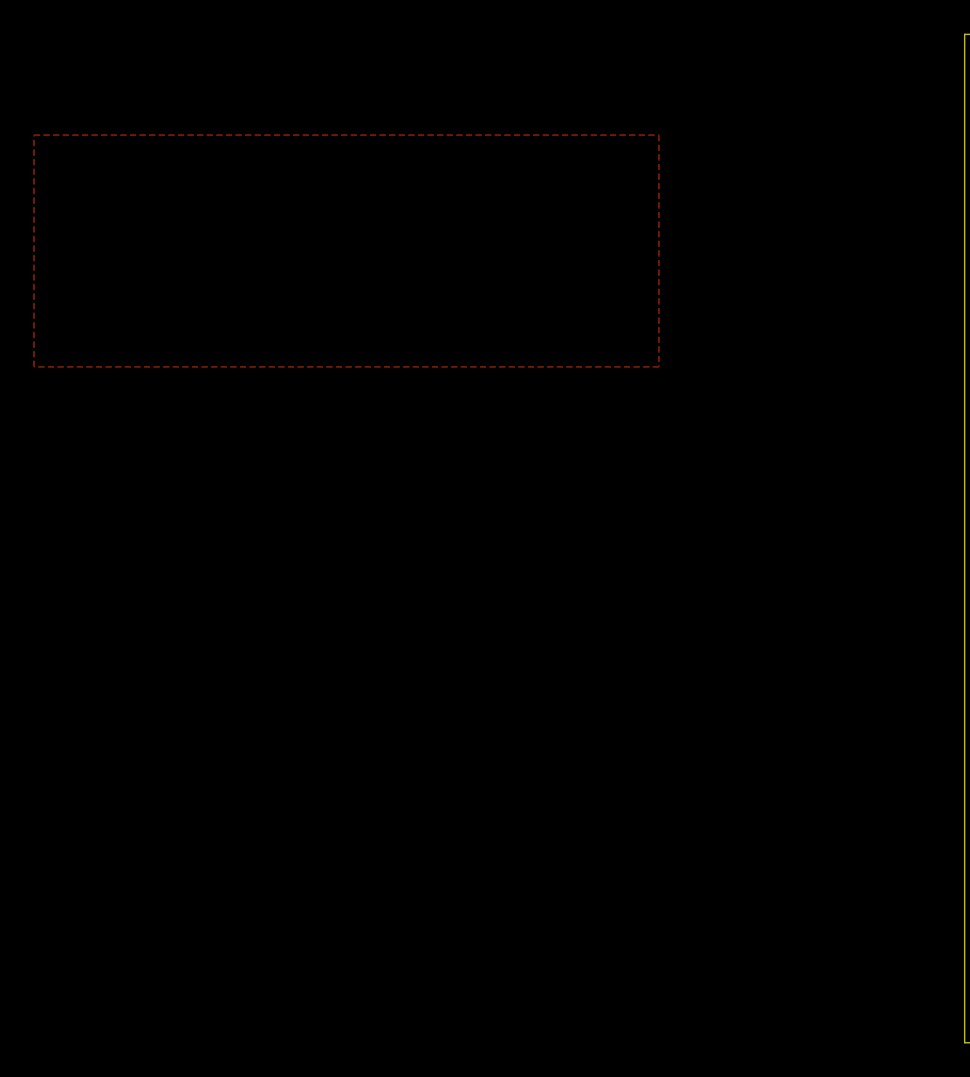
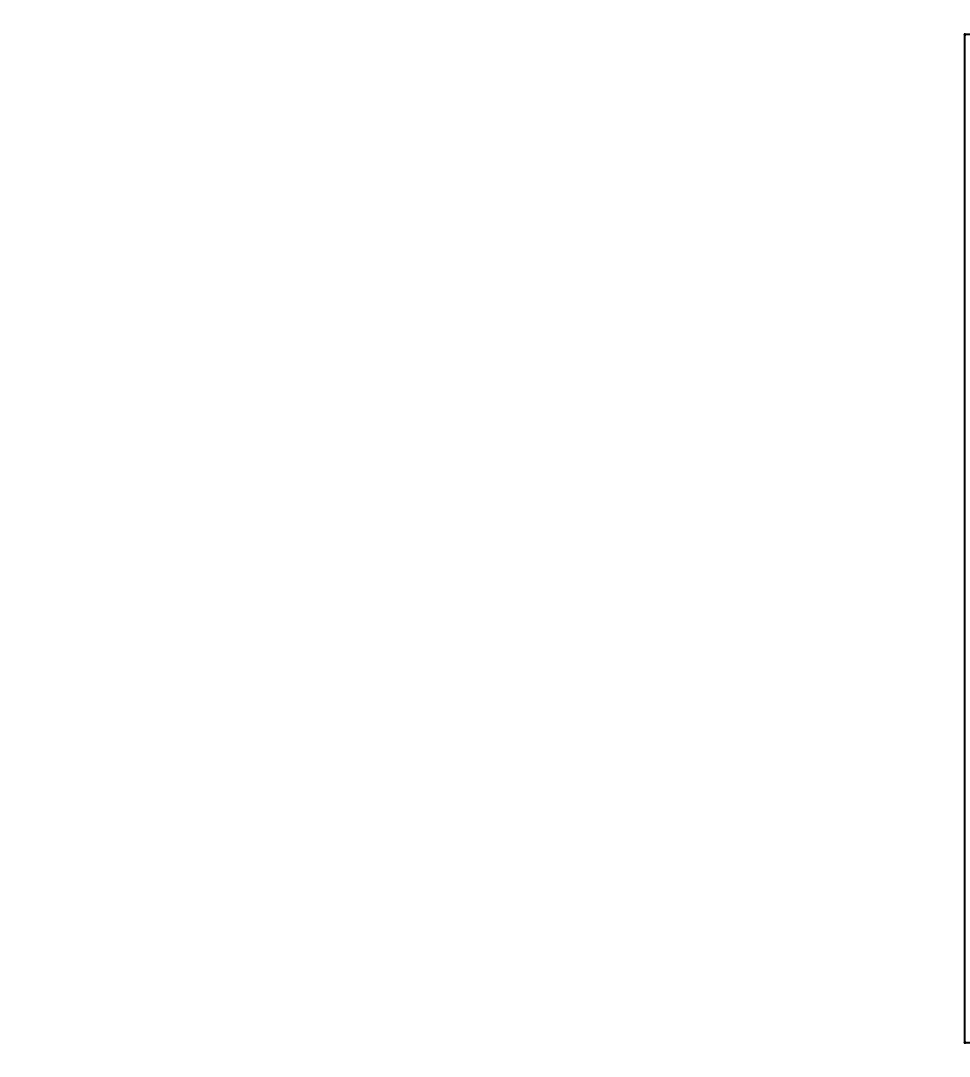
top zone outline: (34, 135) (658, 135) (658, 366) (34, 366) (34, 135) -> none

